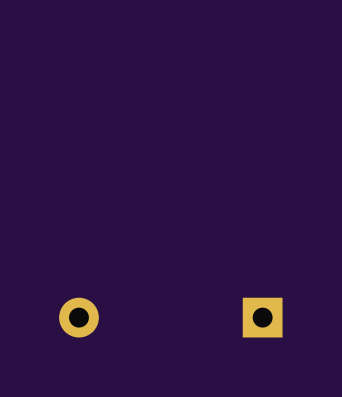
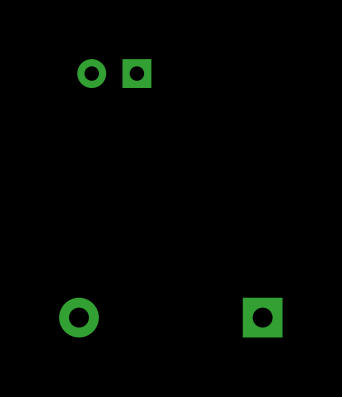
part: none -> (114, 73)

